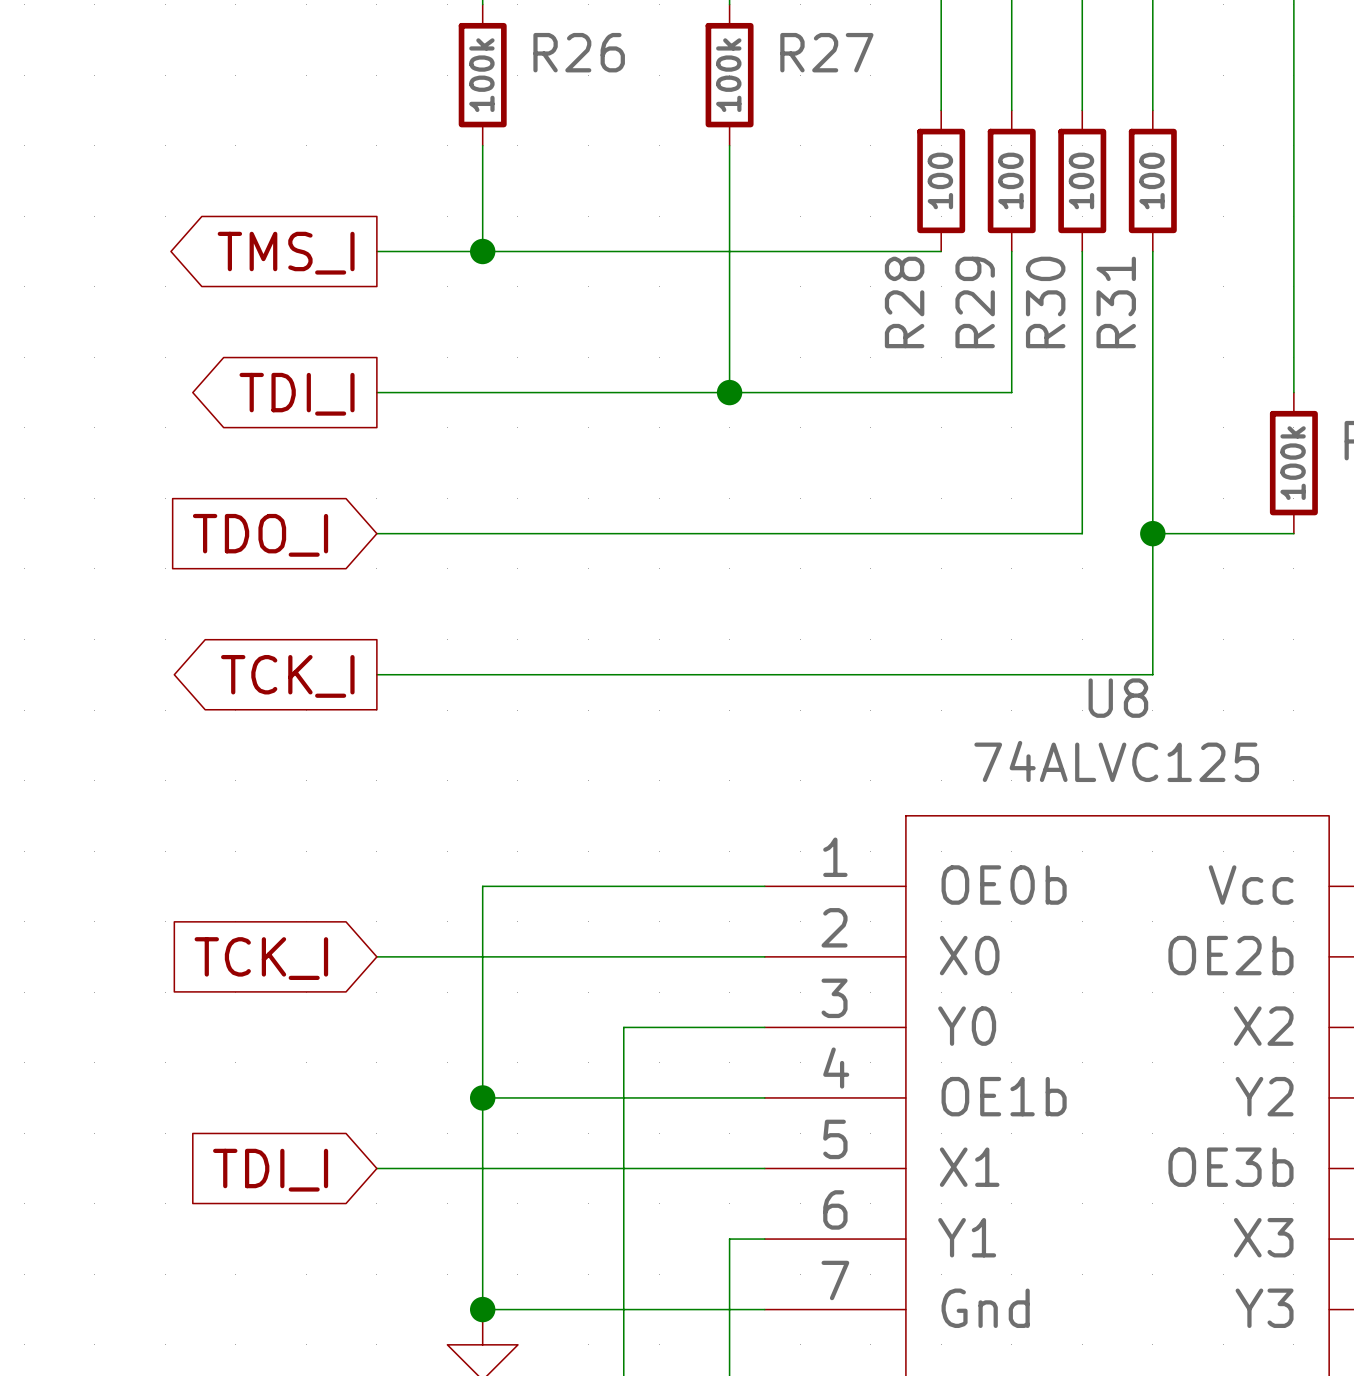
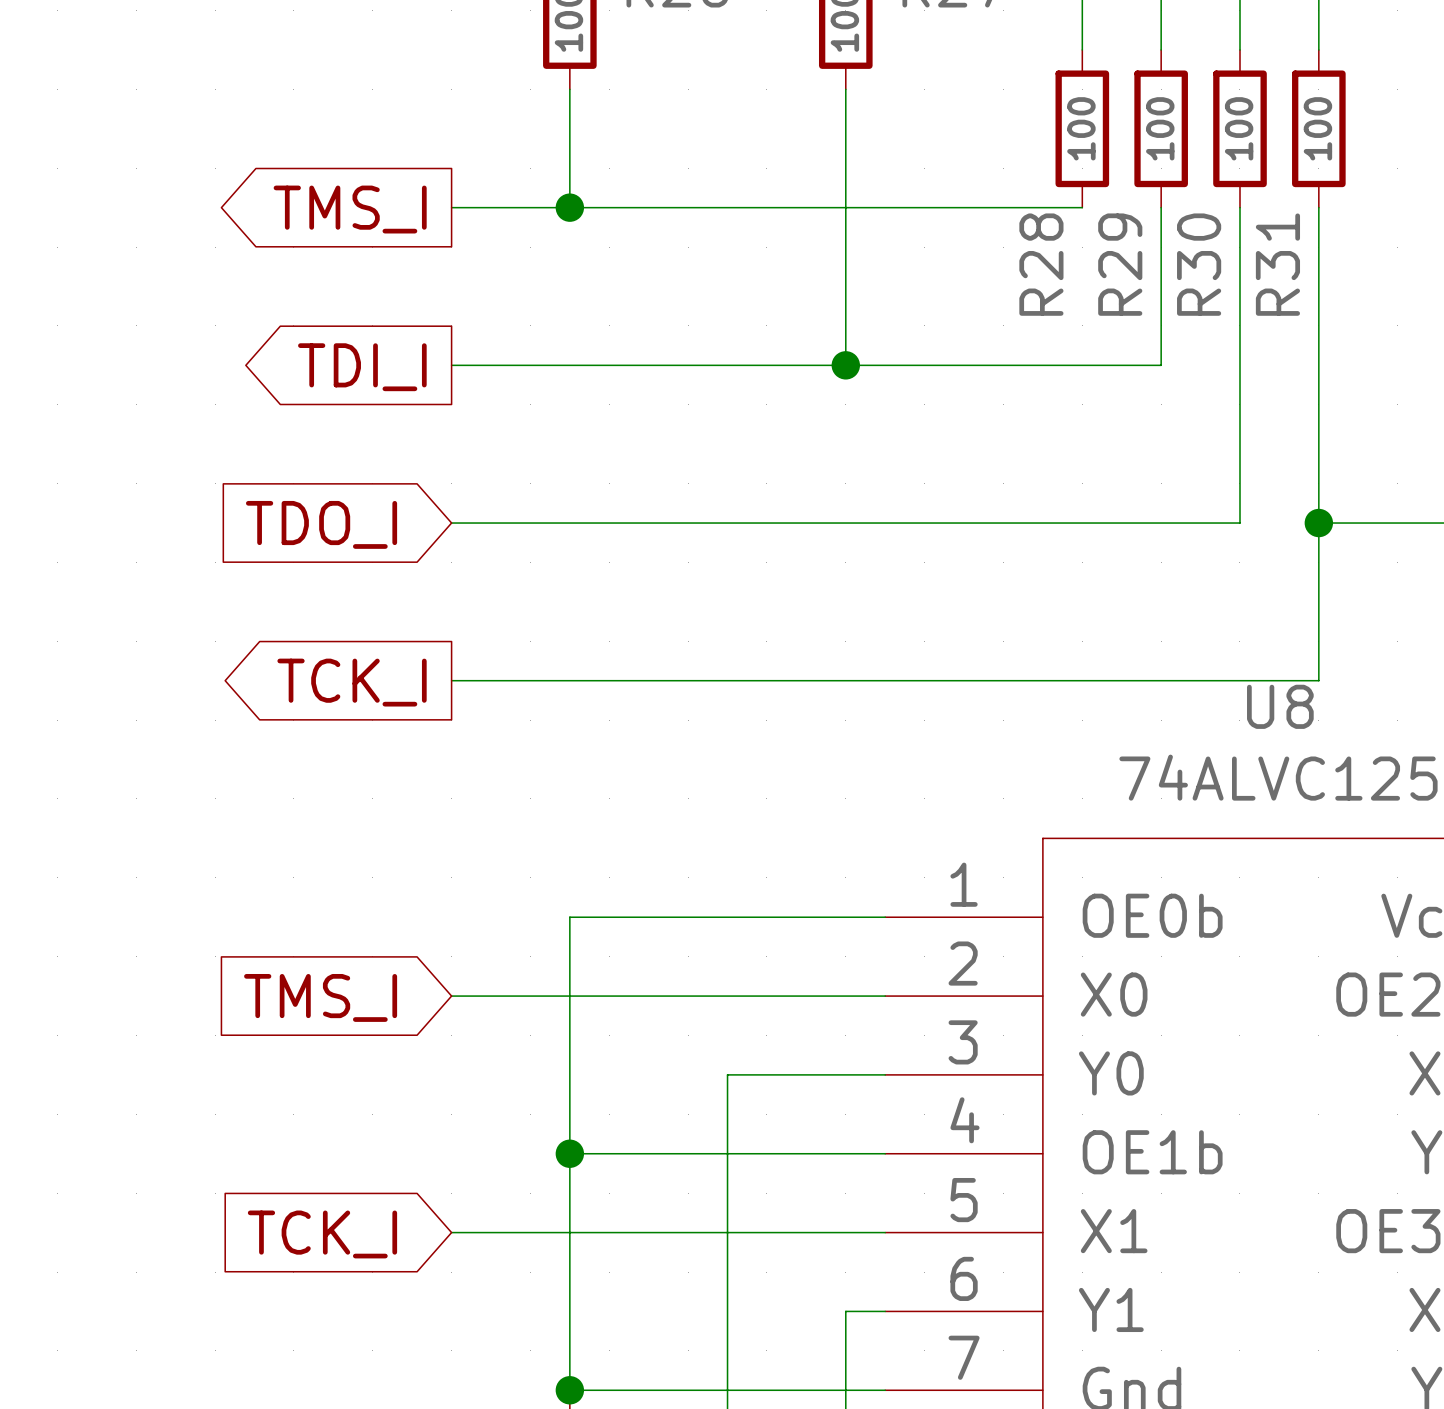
global label: TCK_I (261, 958) -> TMS_I (320, 997)
global label: TDI_I (270, 1170) -> TCK_I (322, 1234)

